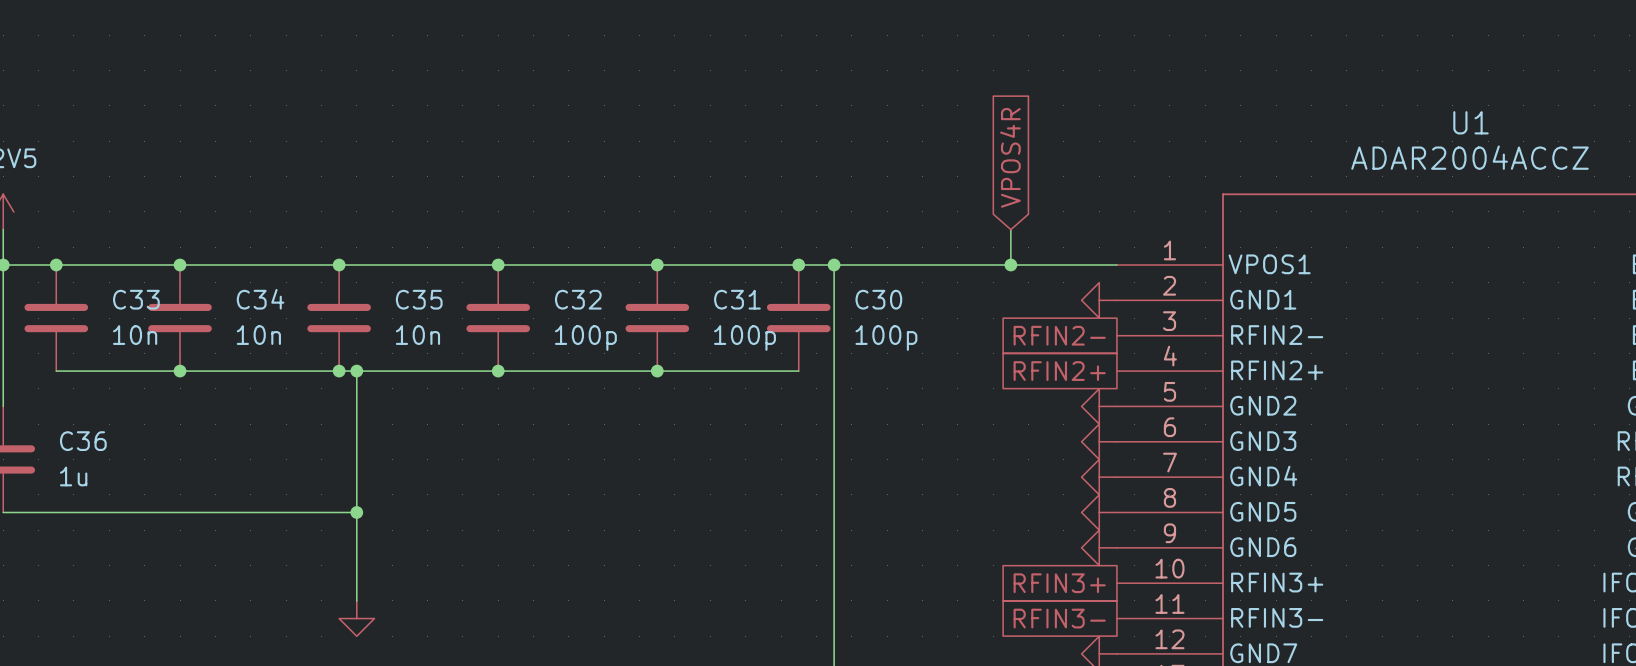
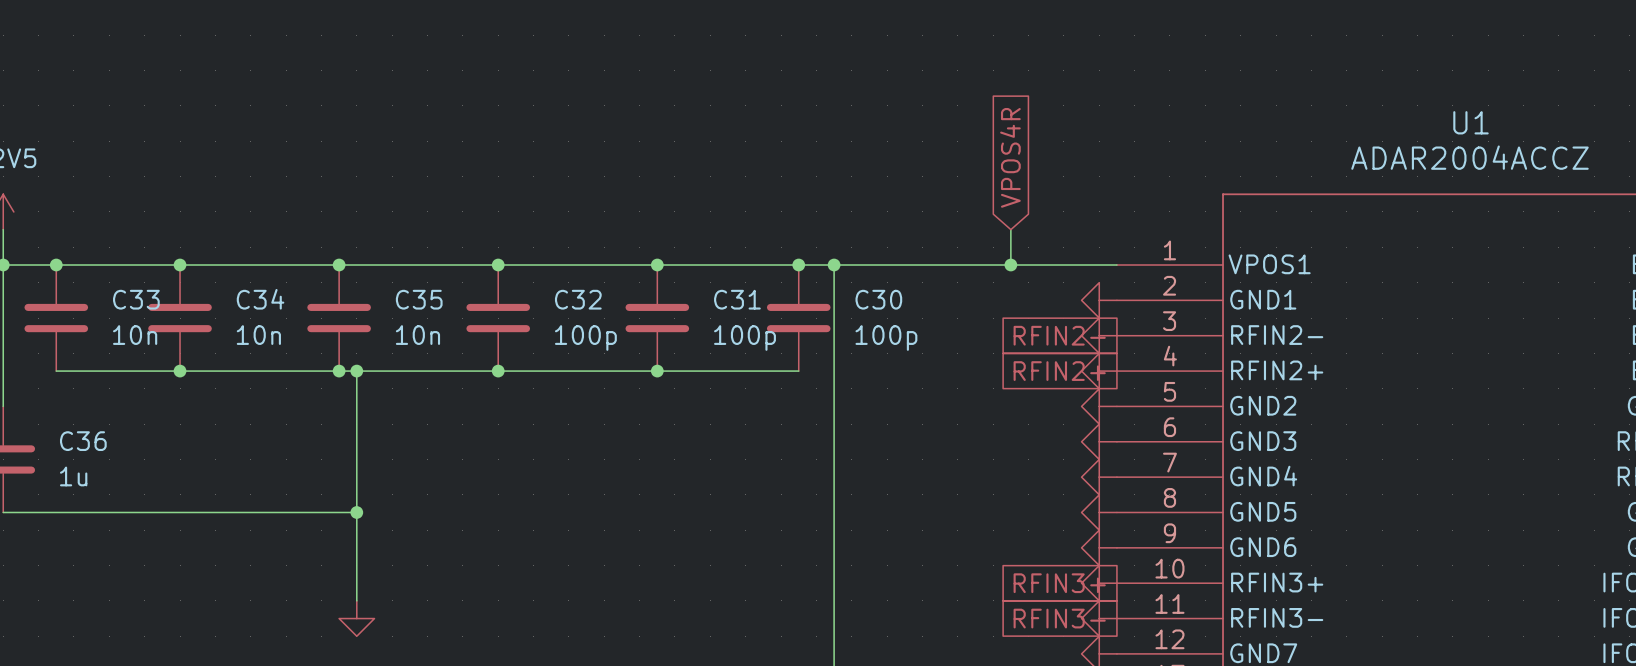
power symbol: none -> (1099, 335)
power symbol: none -> (1099, 371)
power symbol: none -> (1099, 583)
power symbol: none -> (1099, 618)

